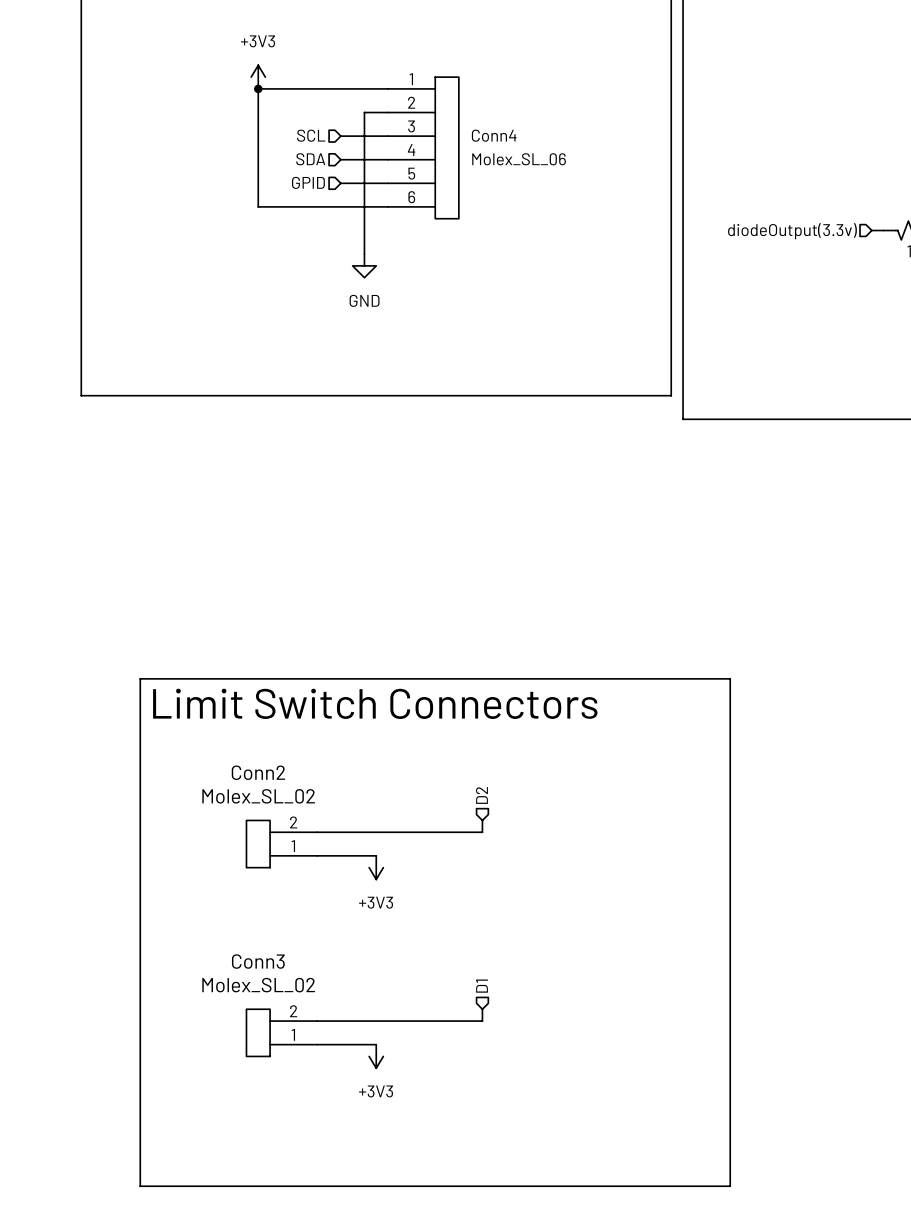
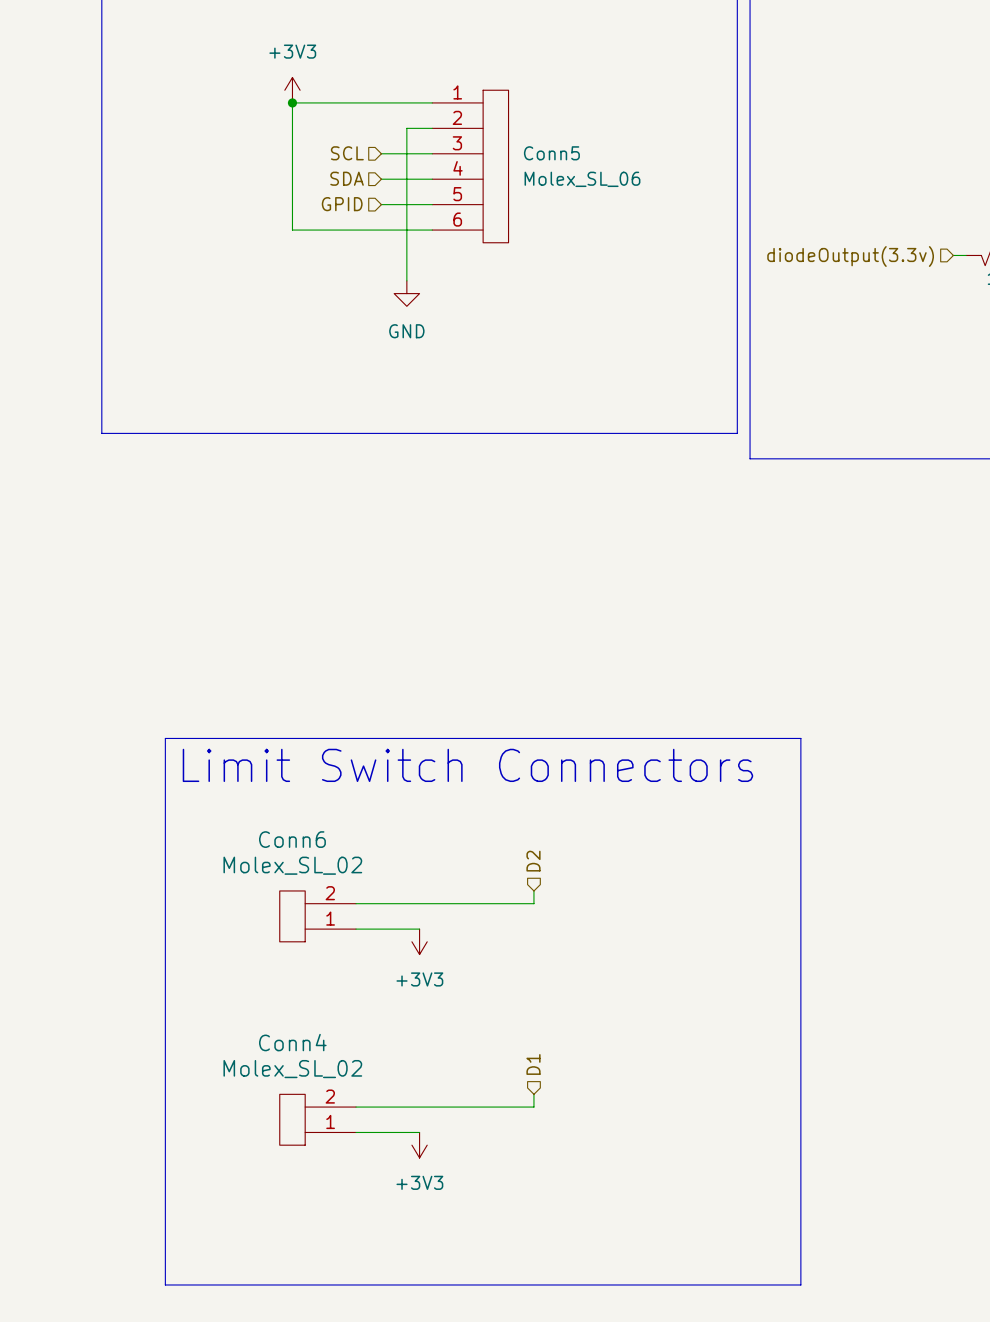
Conn4 name: Conn4 (494, 135) -> Conn5 (551, 153)
Conn2 name: Conn2 (258, 772) -> Conn6 (292, 839)
Conn3 name: Conn3 (258, 961) -> Conn4 (292, 1042)

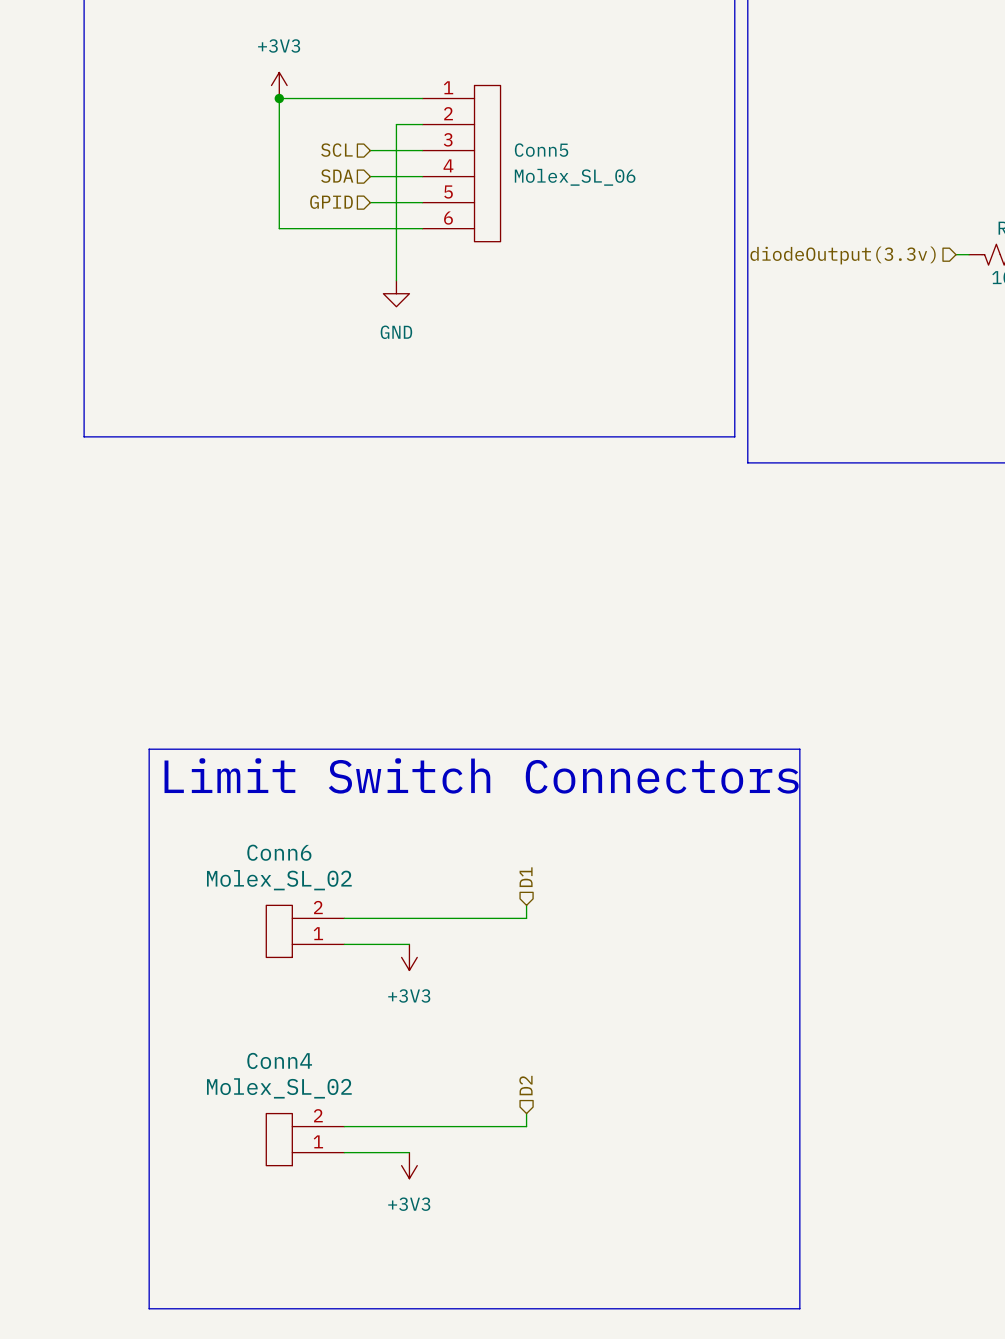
hierarchical label: D2 (533, 861) -> D1 (526, 877)
hierarchical label: D1 (533, 1064) -> D2 (525, 1085)

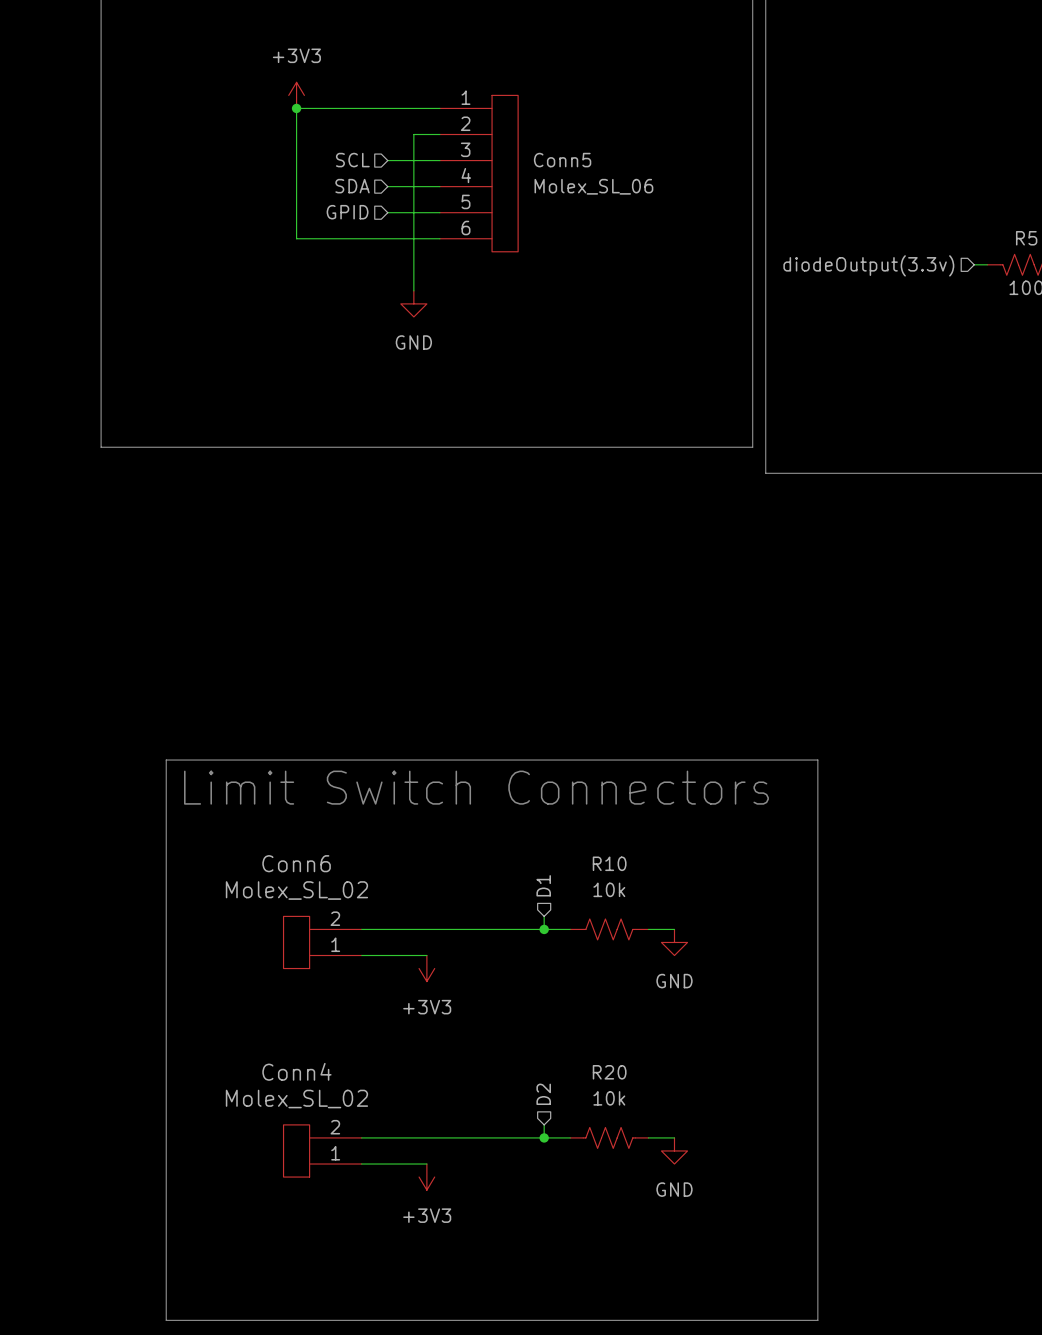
wire: none -> (544, 929) (570, 929)
junction: none -> (544, 929)
R10: none -> 10k (609, 929)
wire: none -> (648, 929) (674, 929)
power symbol: none -> GND (674, 942)
wire: none -> (544, 1137) (570, 1137)
junction: none -> (544, 1137)
R20: none -> 10k (609, 1137)
wire: none -> (648, 1137) (674, 1137)
power symbol: none -> GND (674, 1150)

